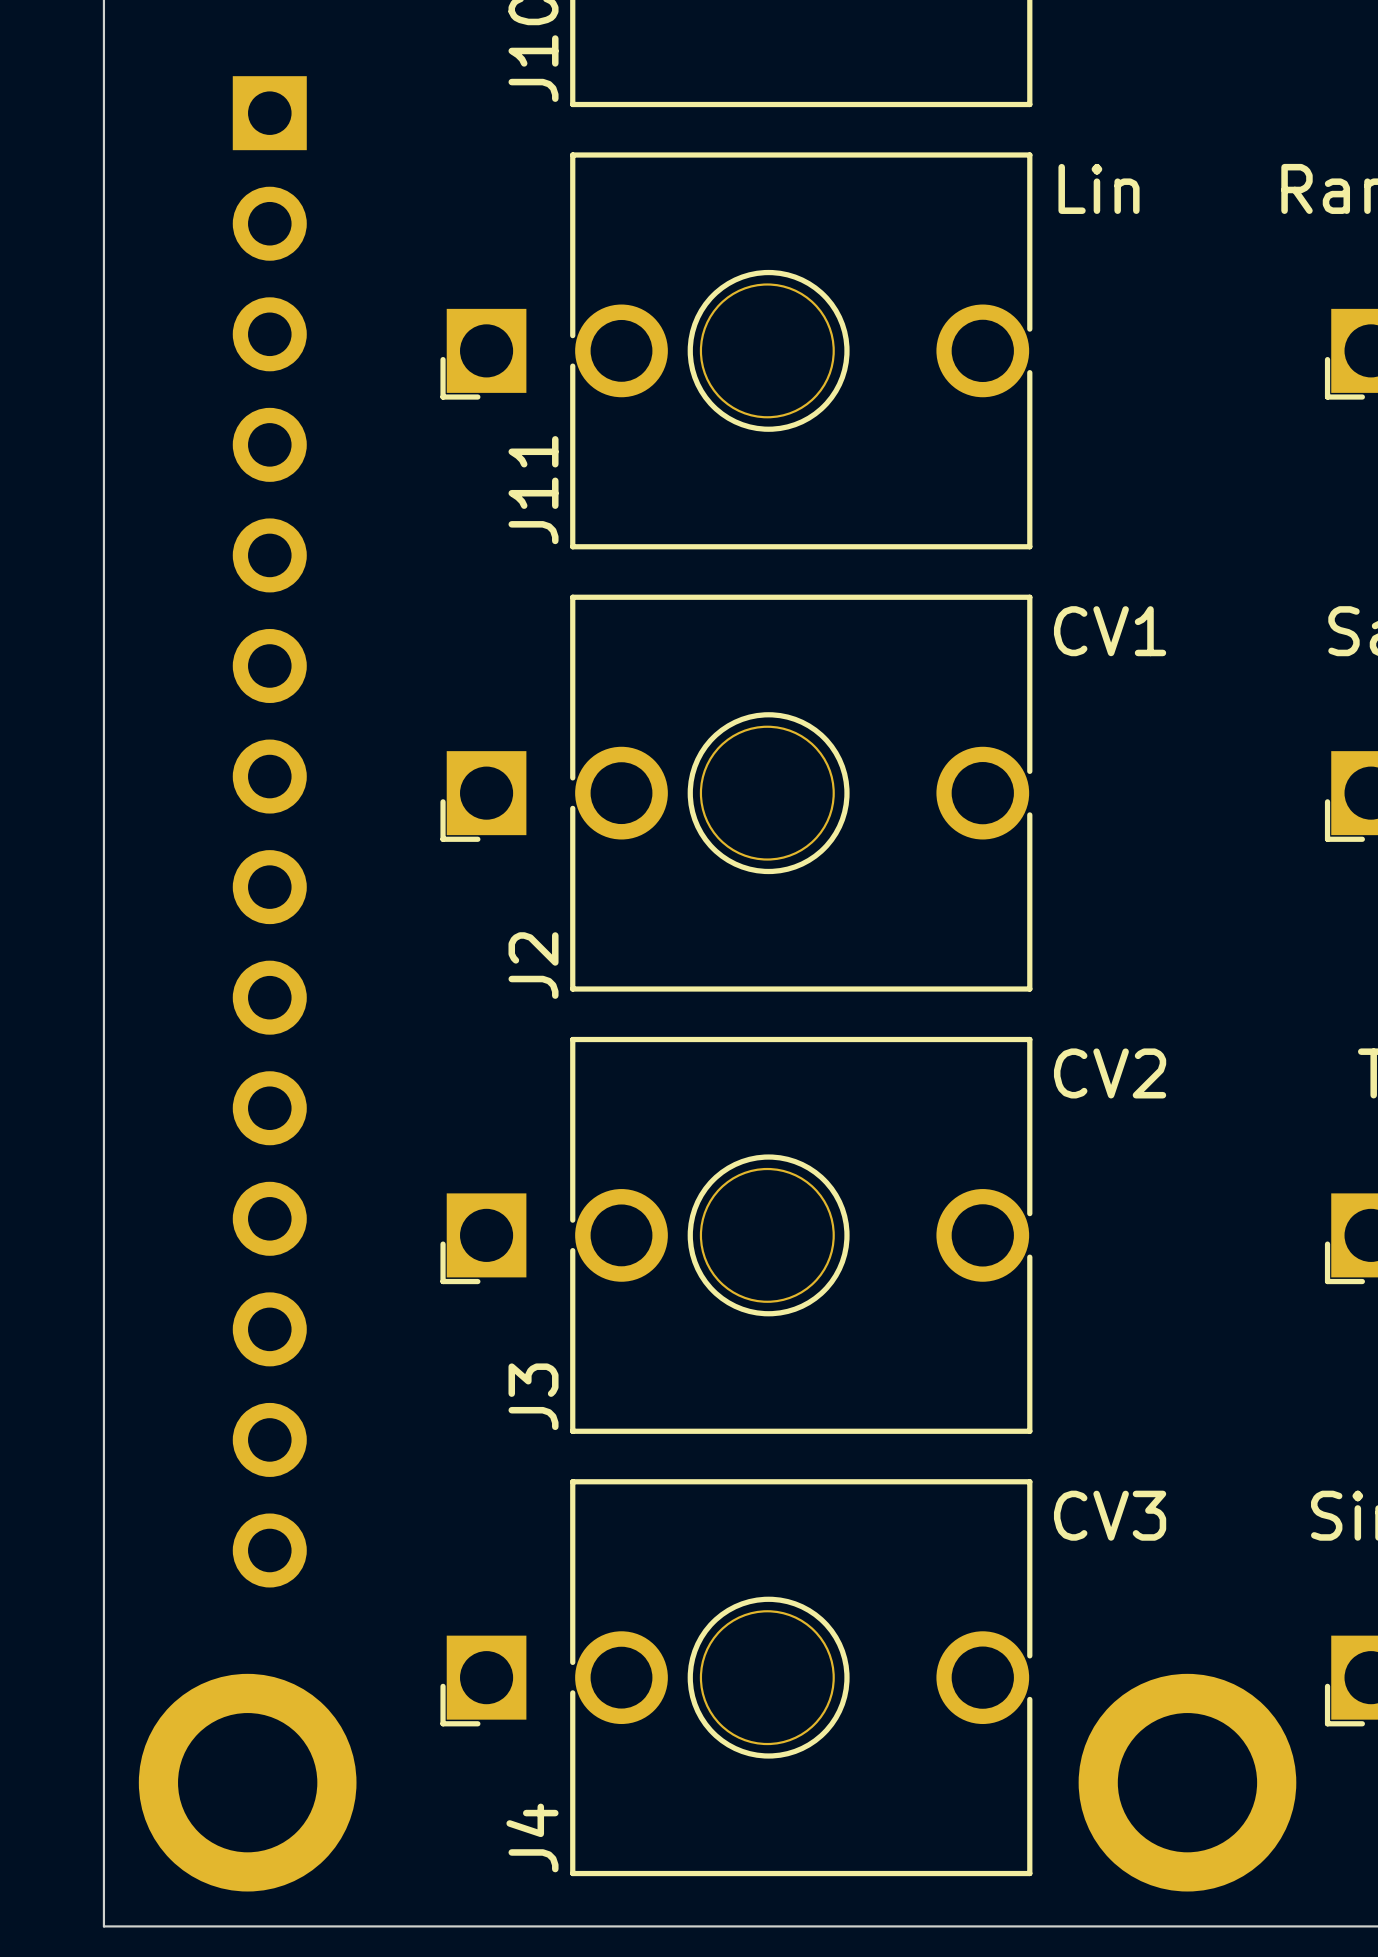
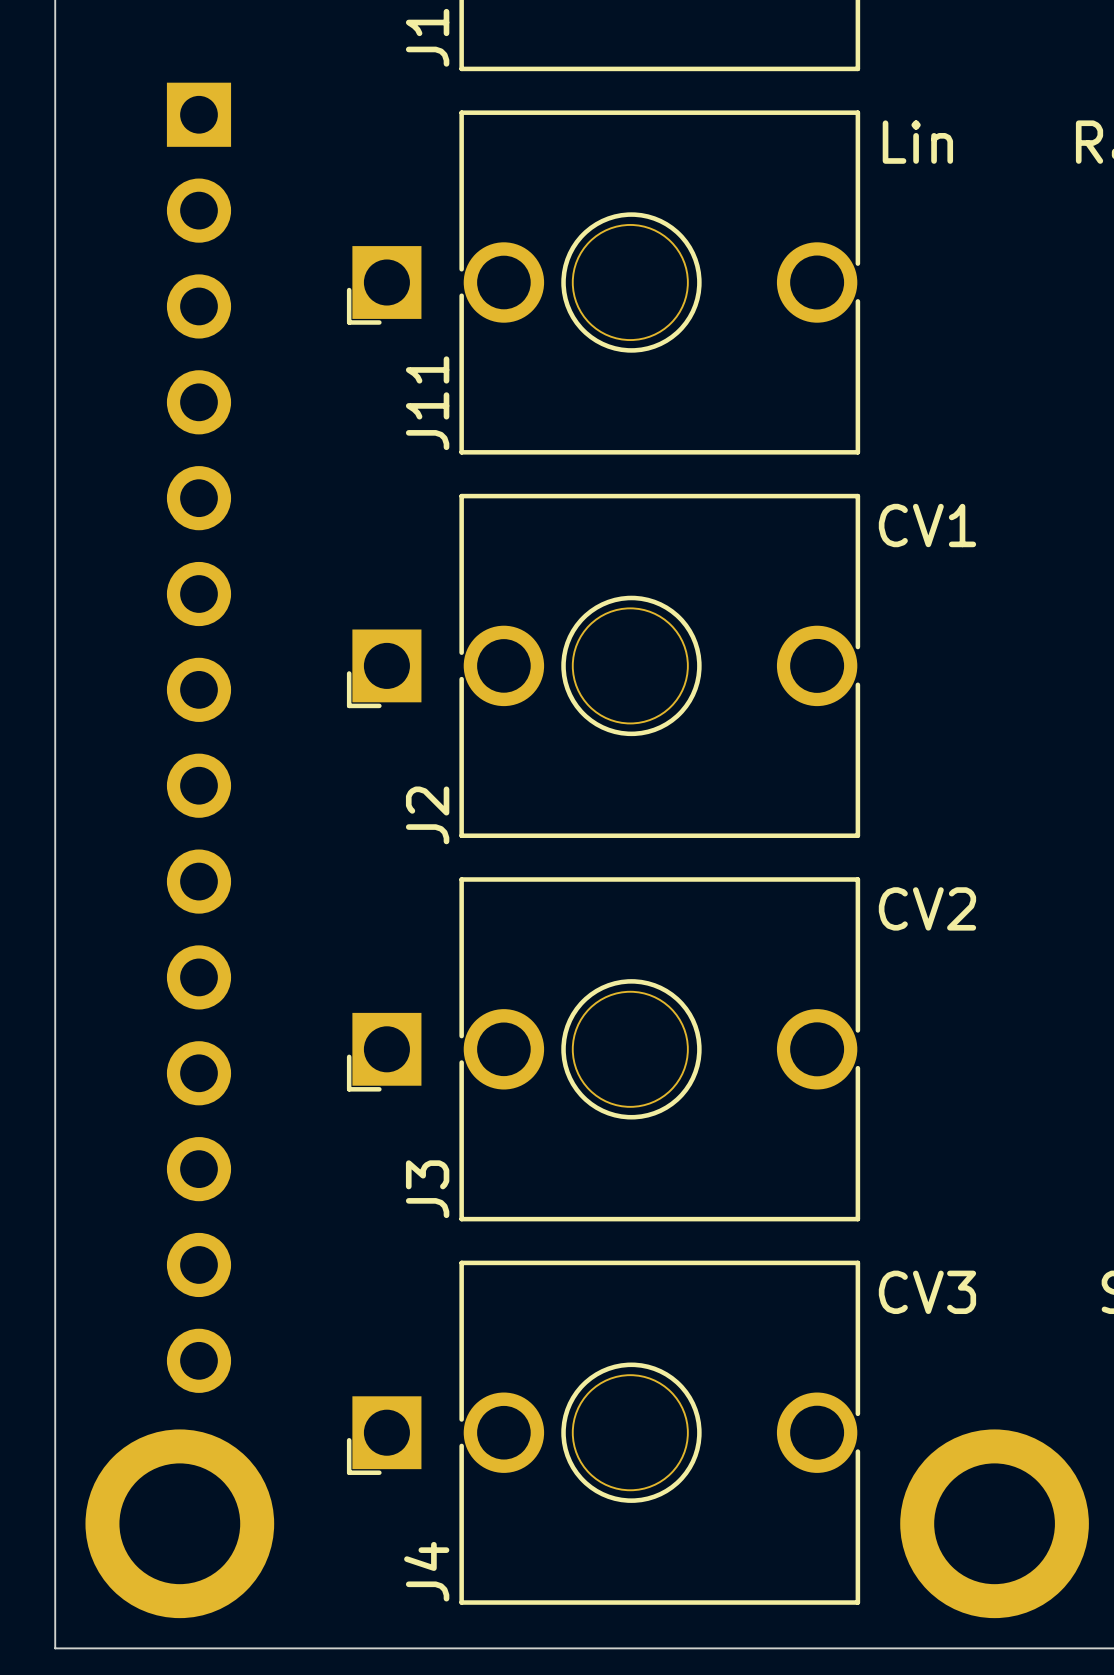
part position: (269, 831) -> (198, 737)

